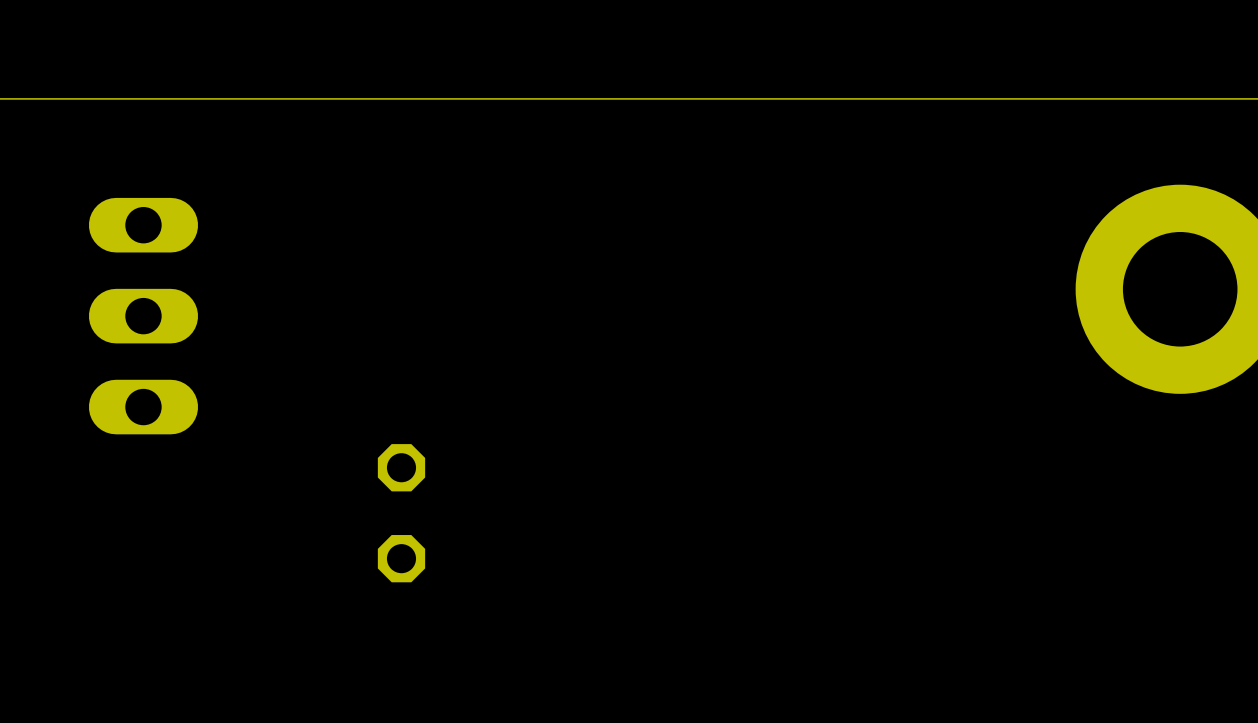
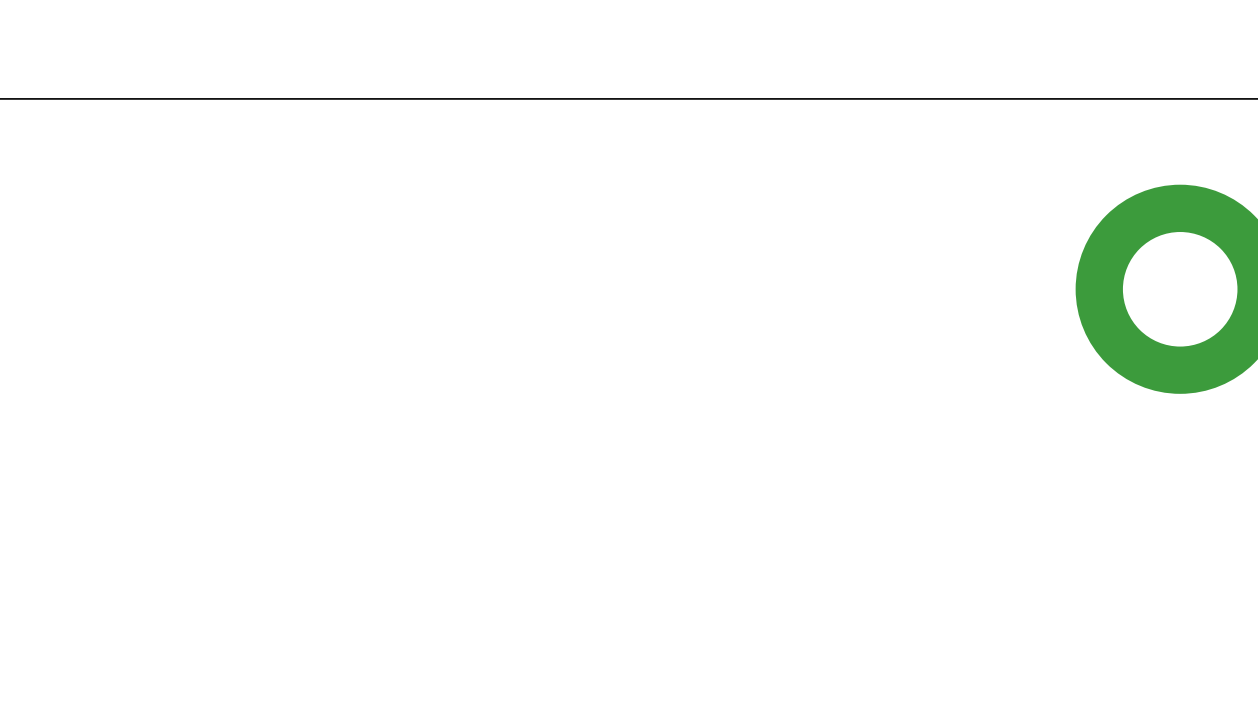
part: (143, 316) -> none
part: (401, 513) -> none

